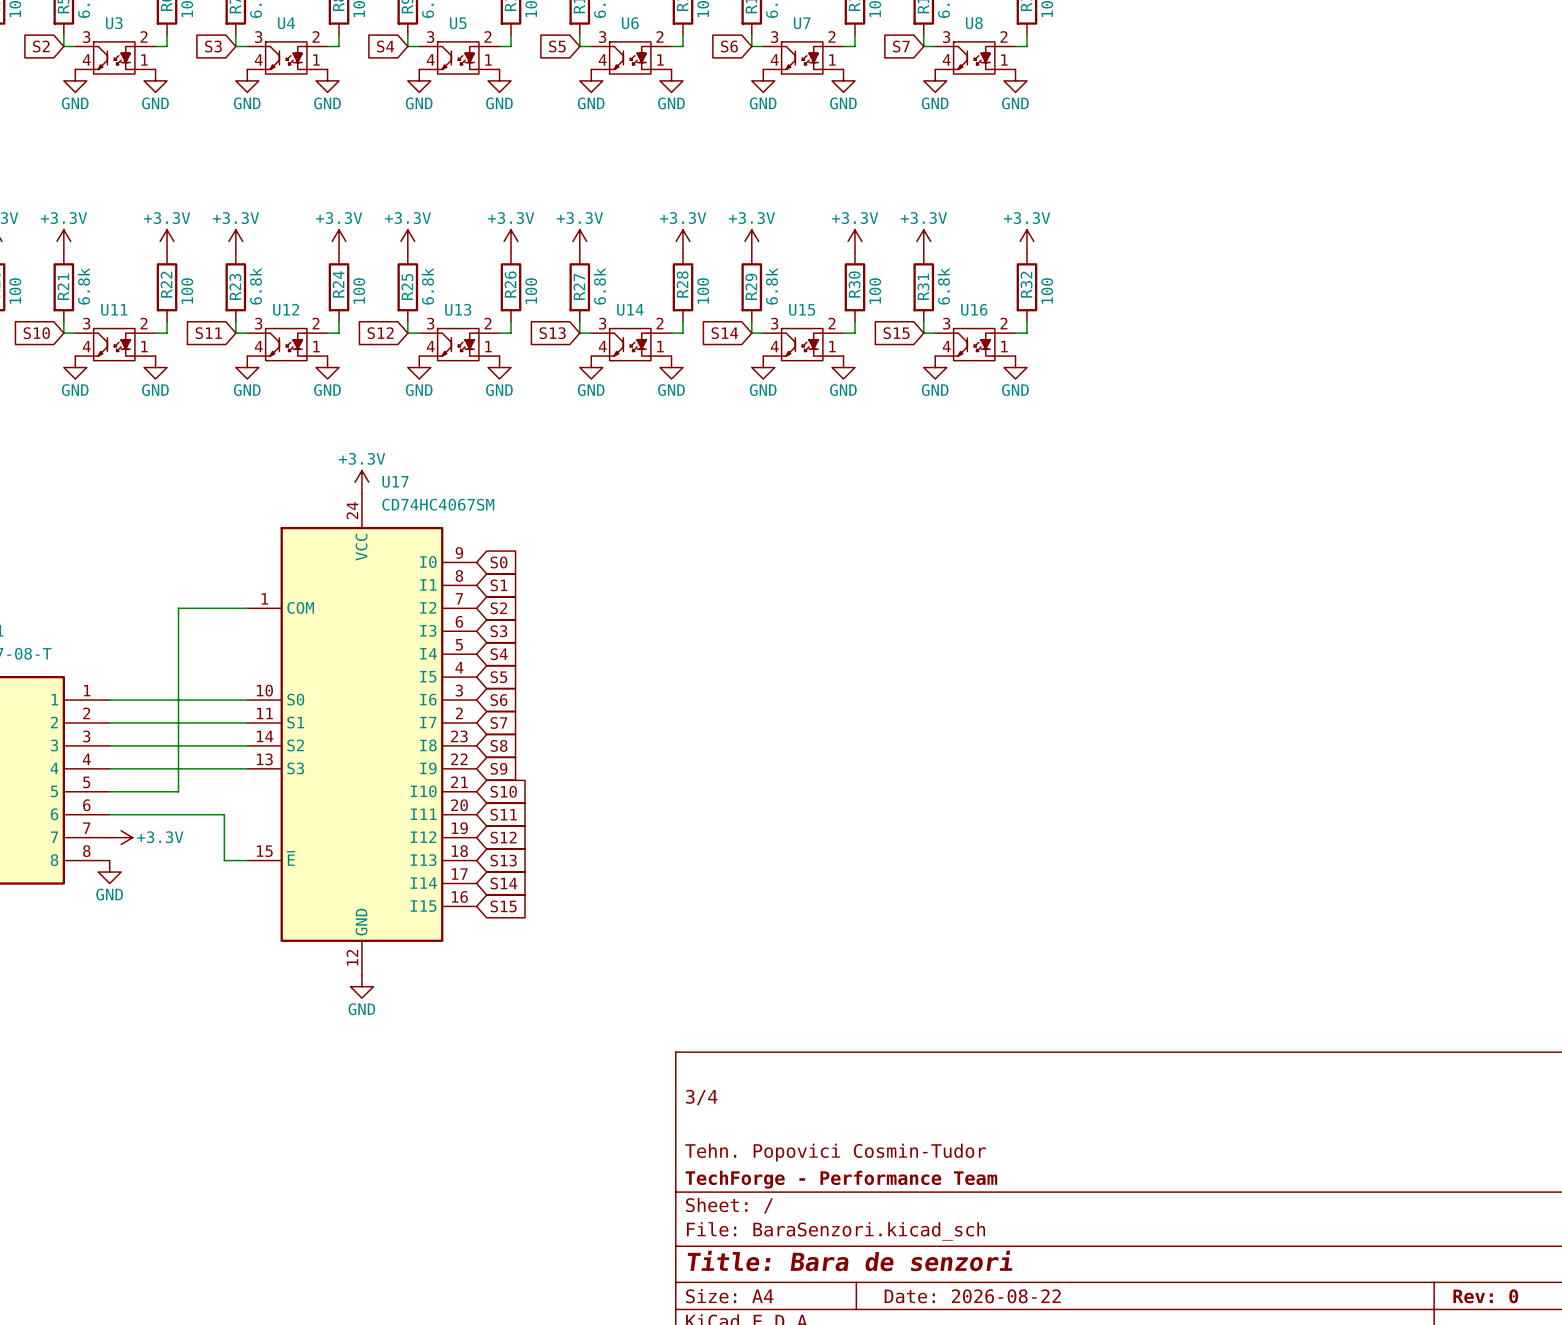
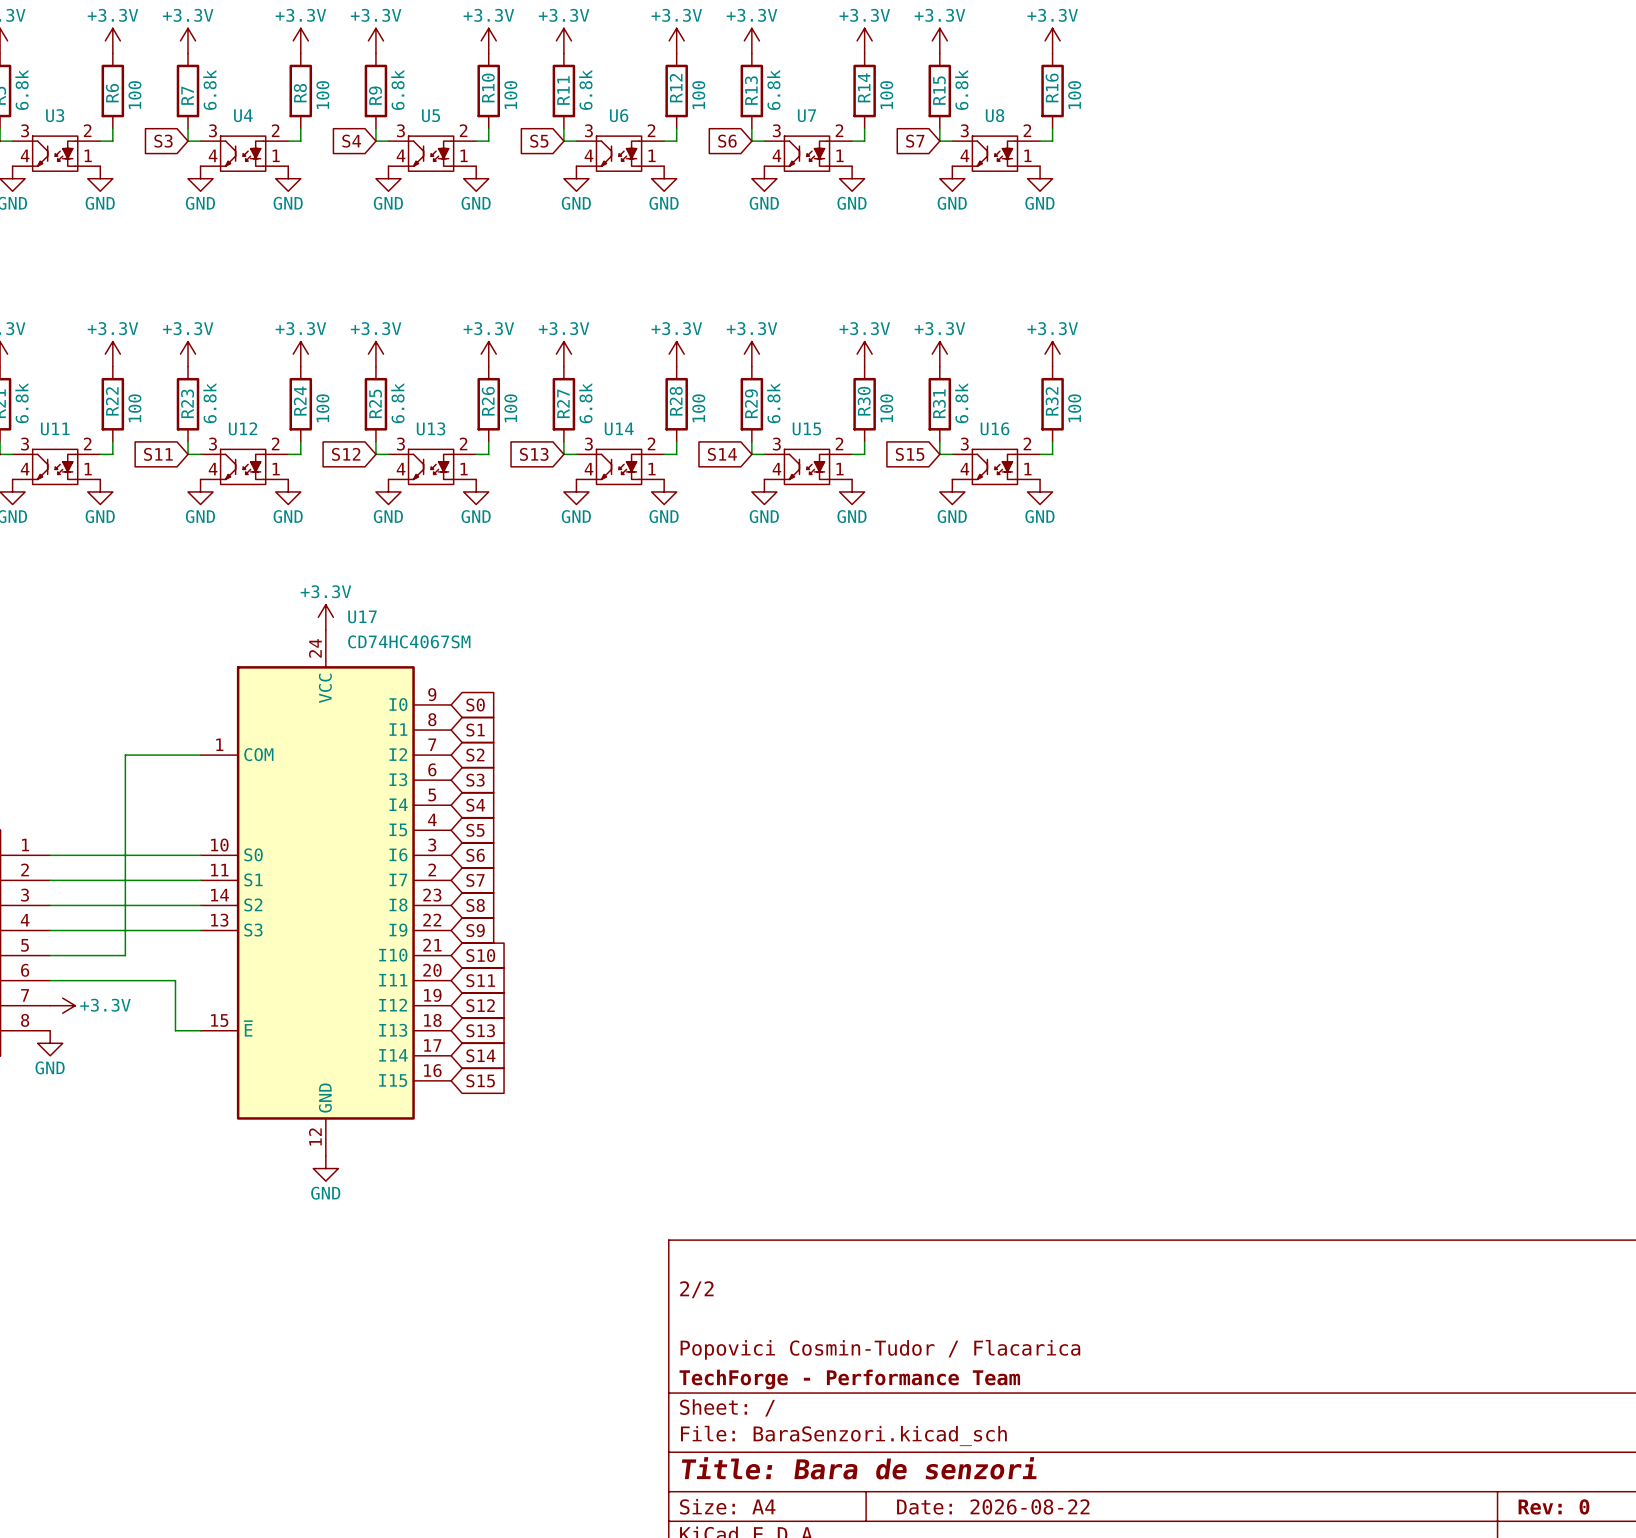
title block: 3/4 (701, 1097) -> 2/2 (696, 1289)
title block: Tehn. Popovici Cosmin-Tudor (835, 1152) -> Popovici Cosmin-Tudor / Flacarica (880, 1349)

